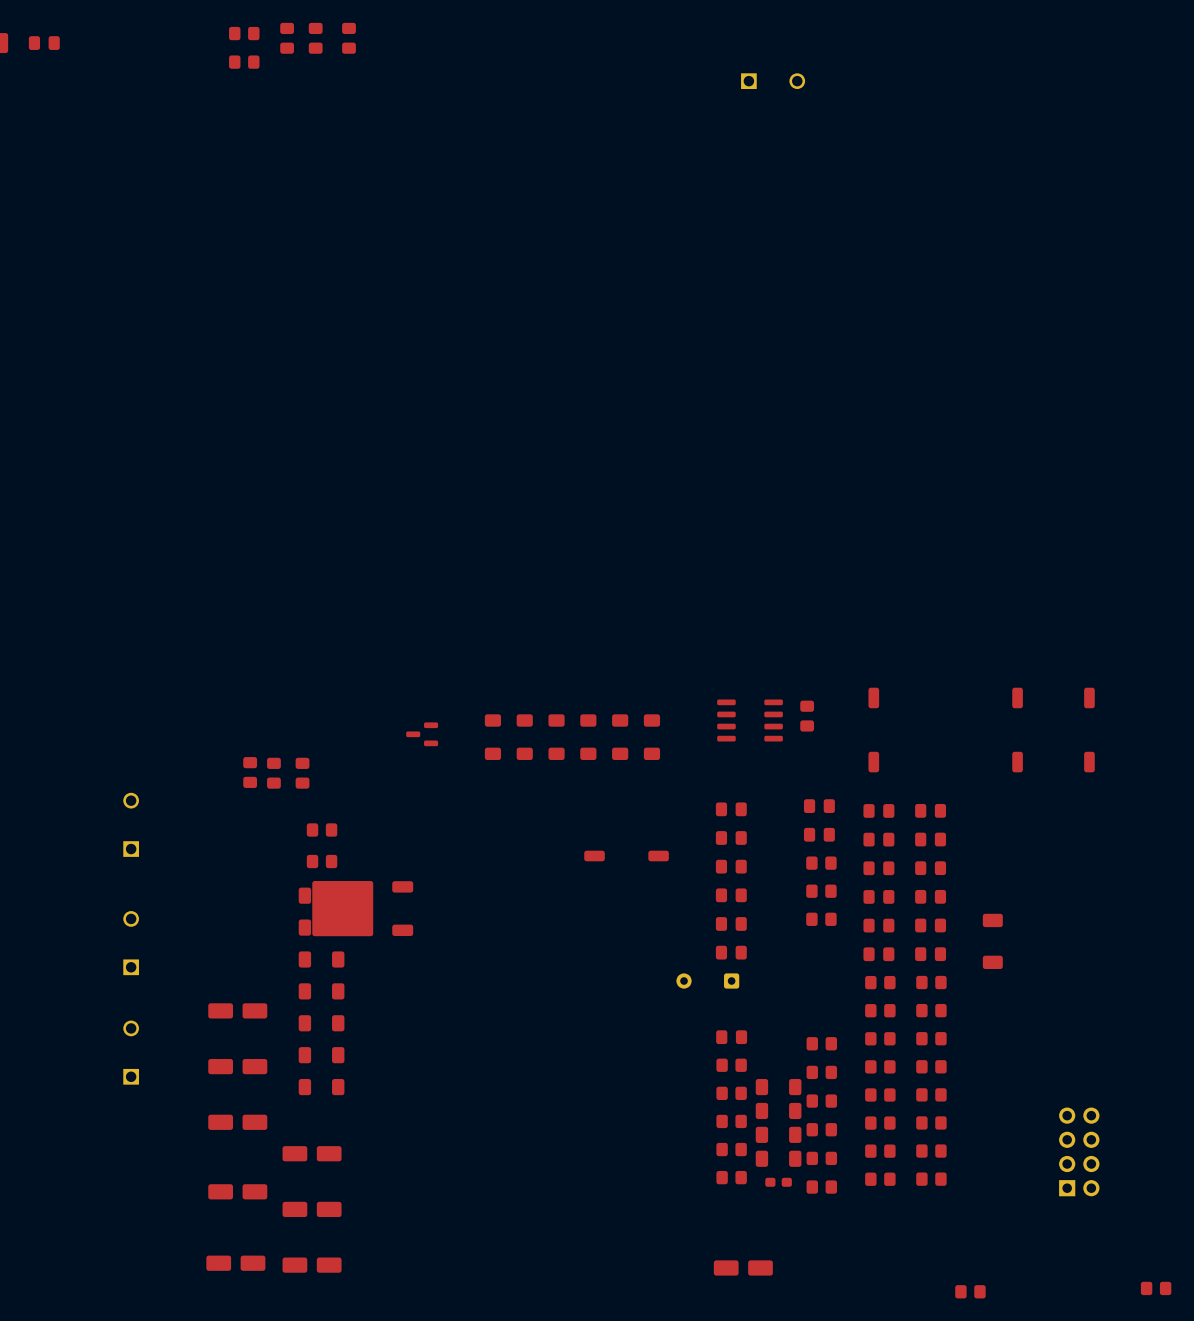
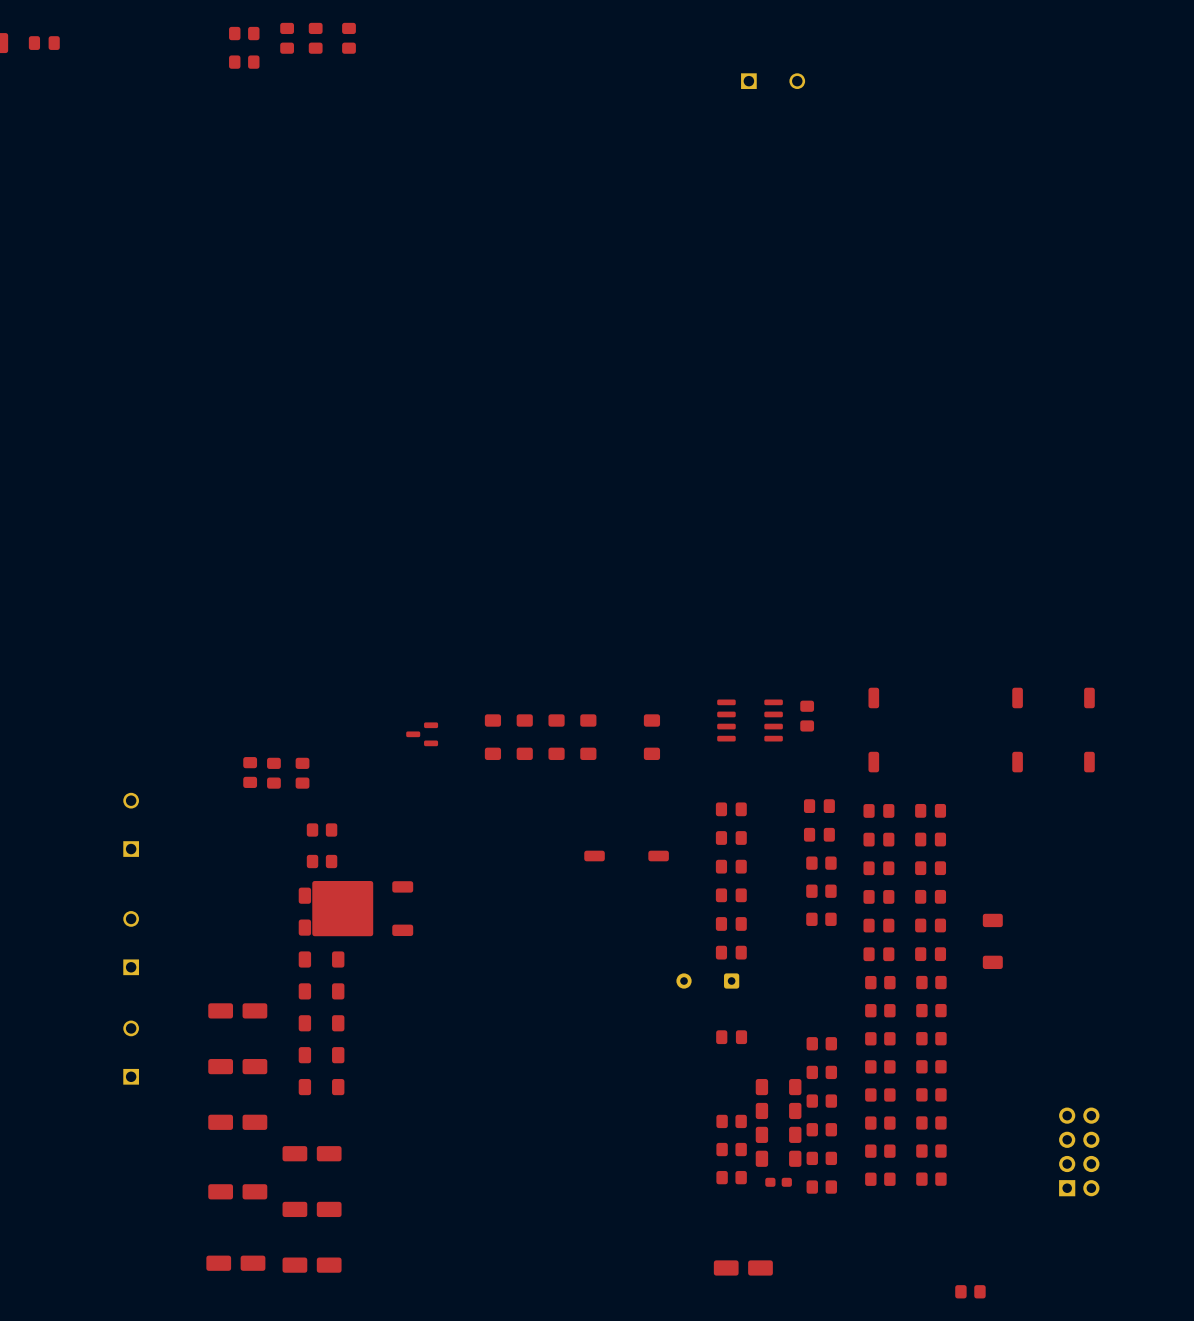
part: (620, 737) -> none
part: (731, 1065) -> none
part: (731, 1093) -> none
part: (1156, 1288) -> none

